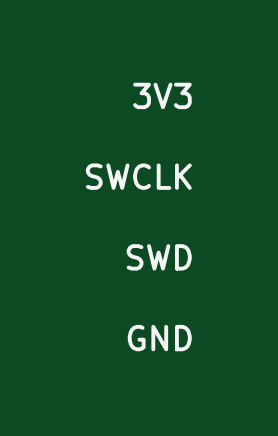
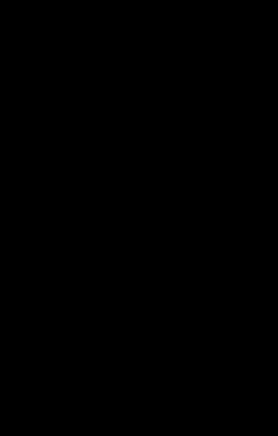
text: 3V3 (162, 95) -> none
text: SWCLK (138, 176) -> none
text: SWD (159, 257) -> none
text: GND (159, 338) -> none

